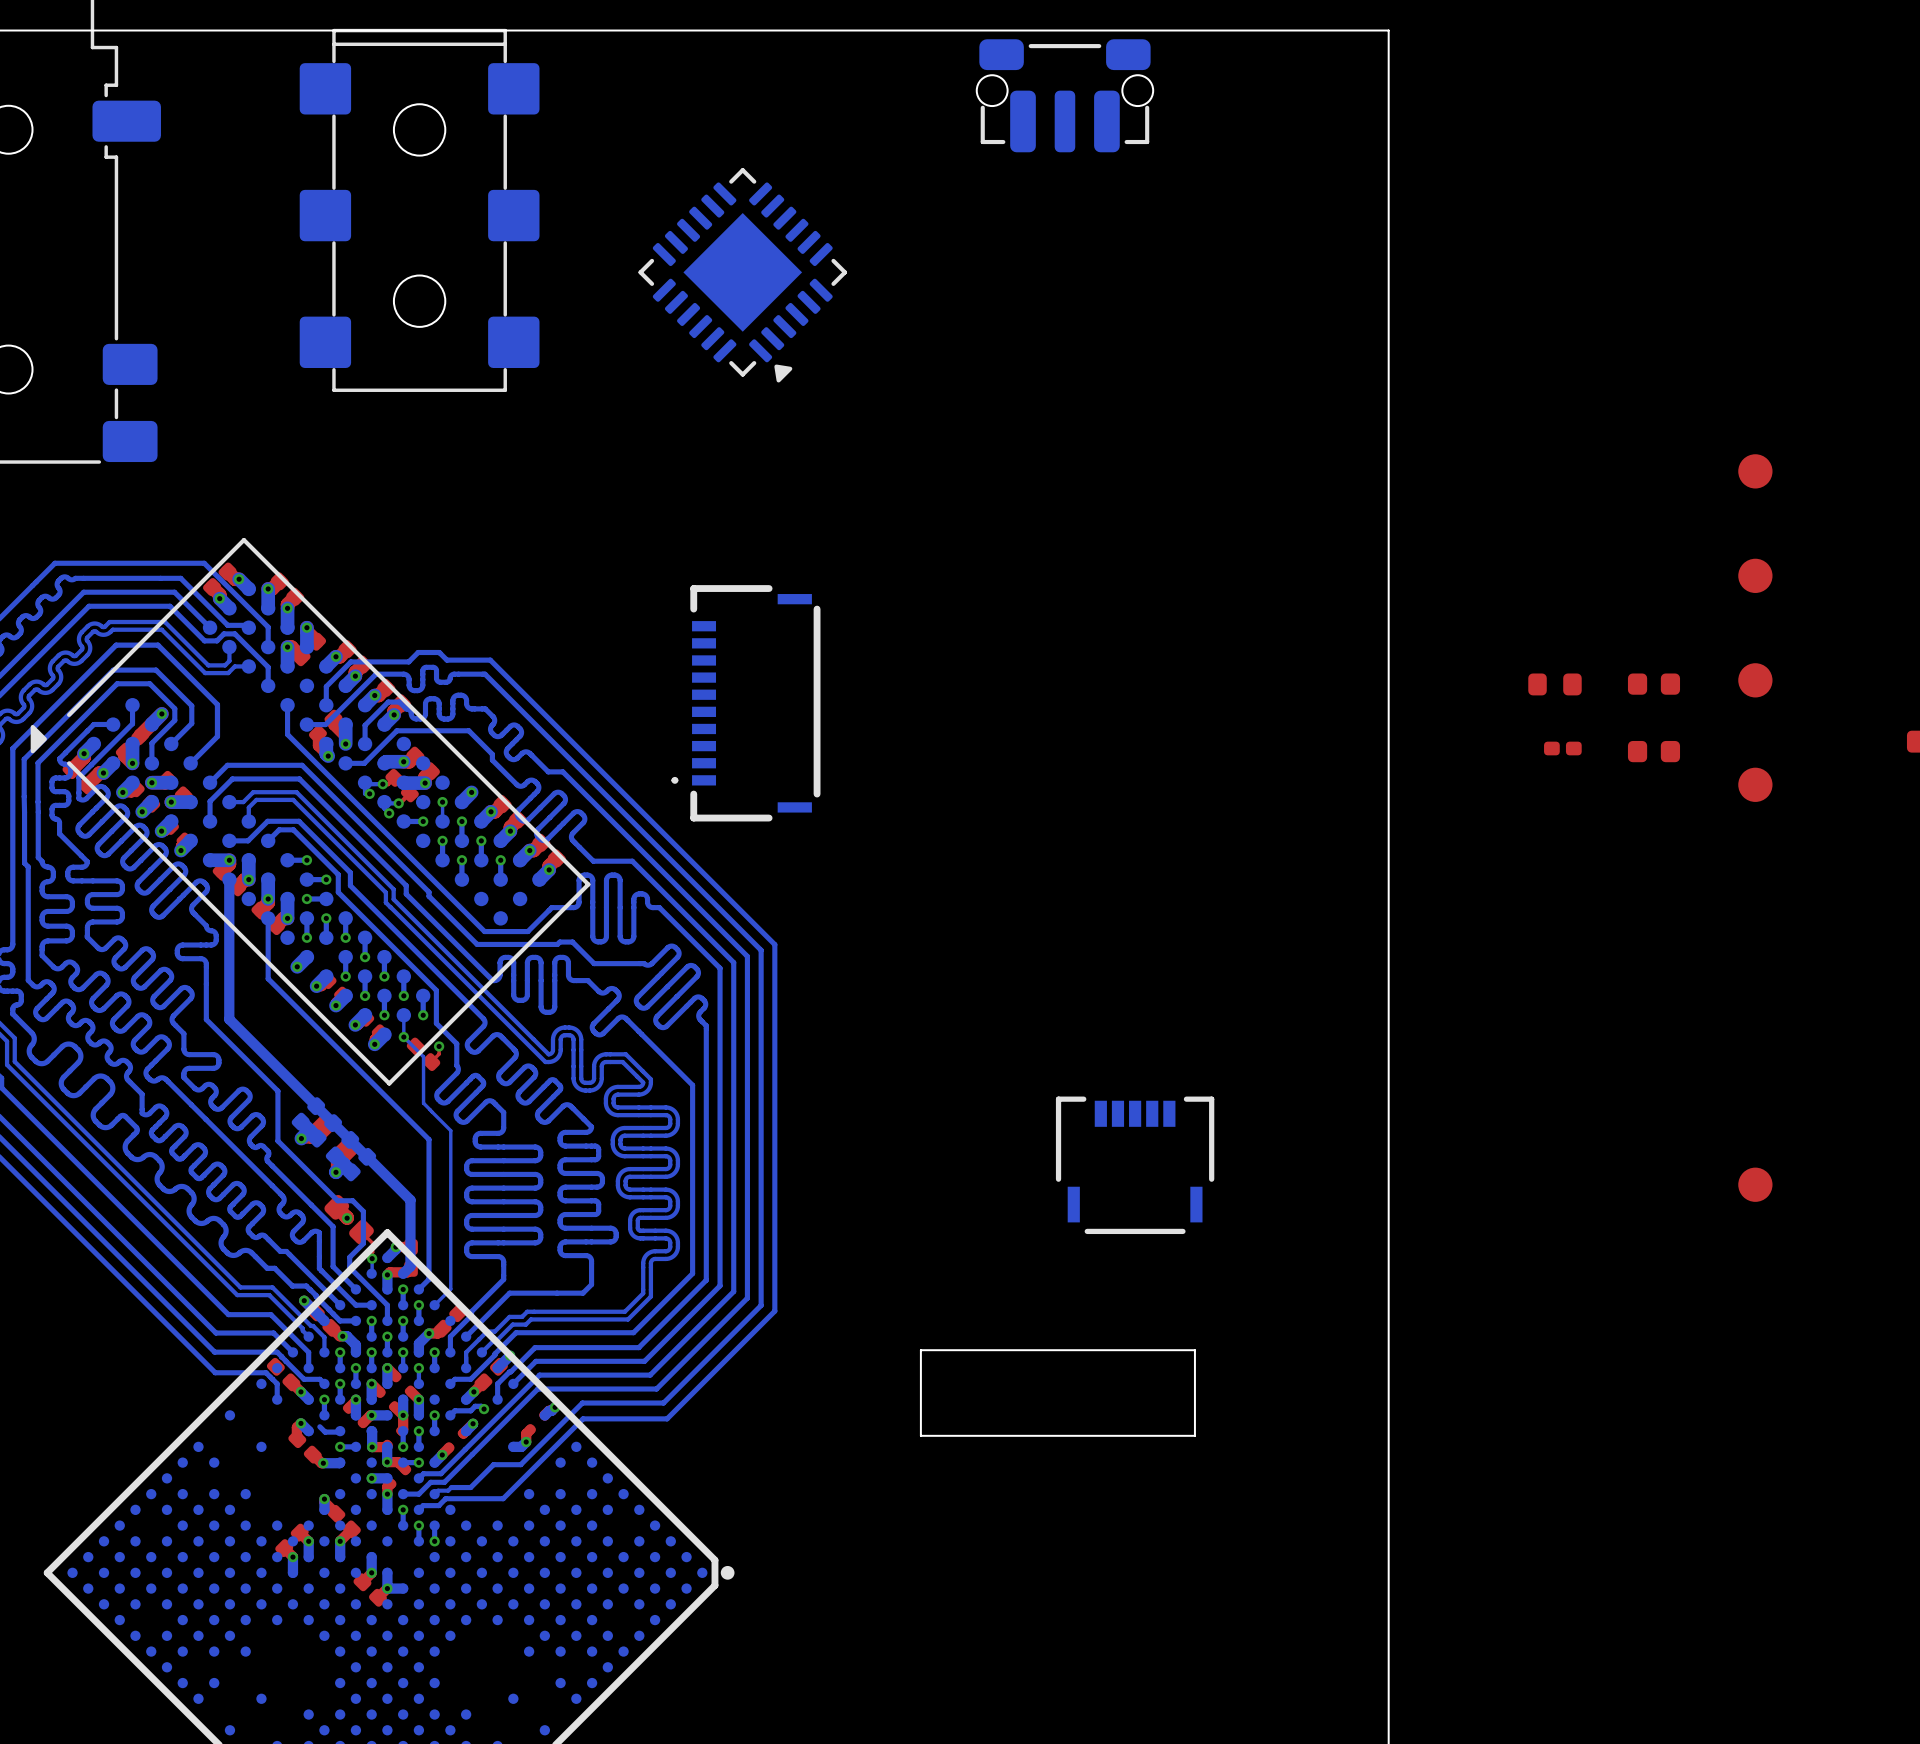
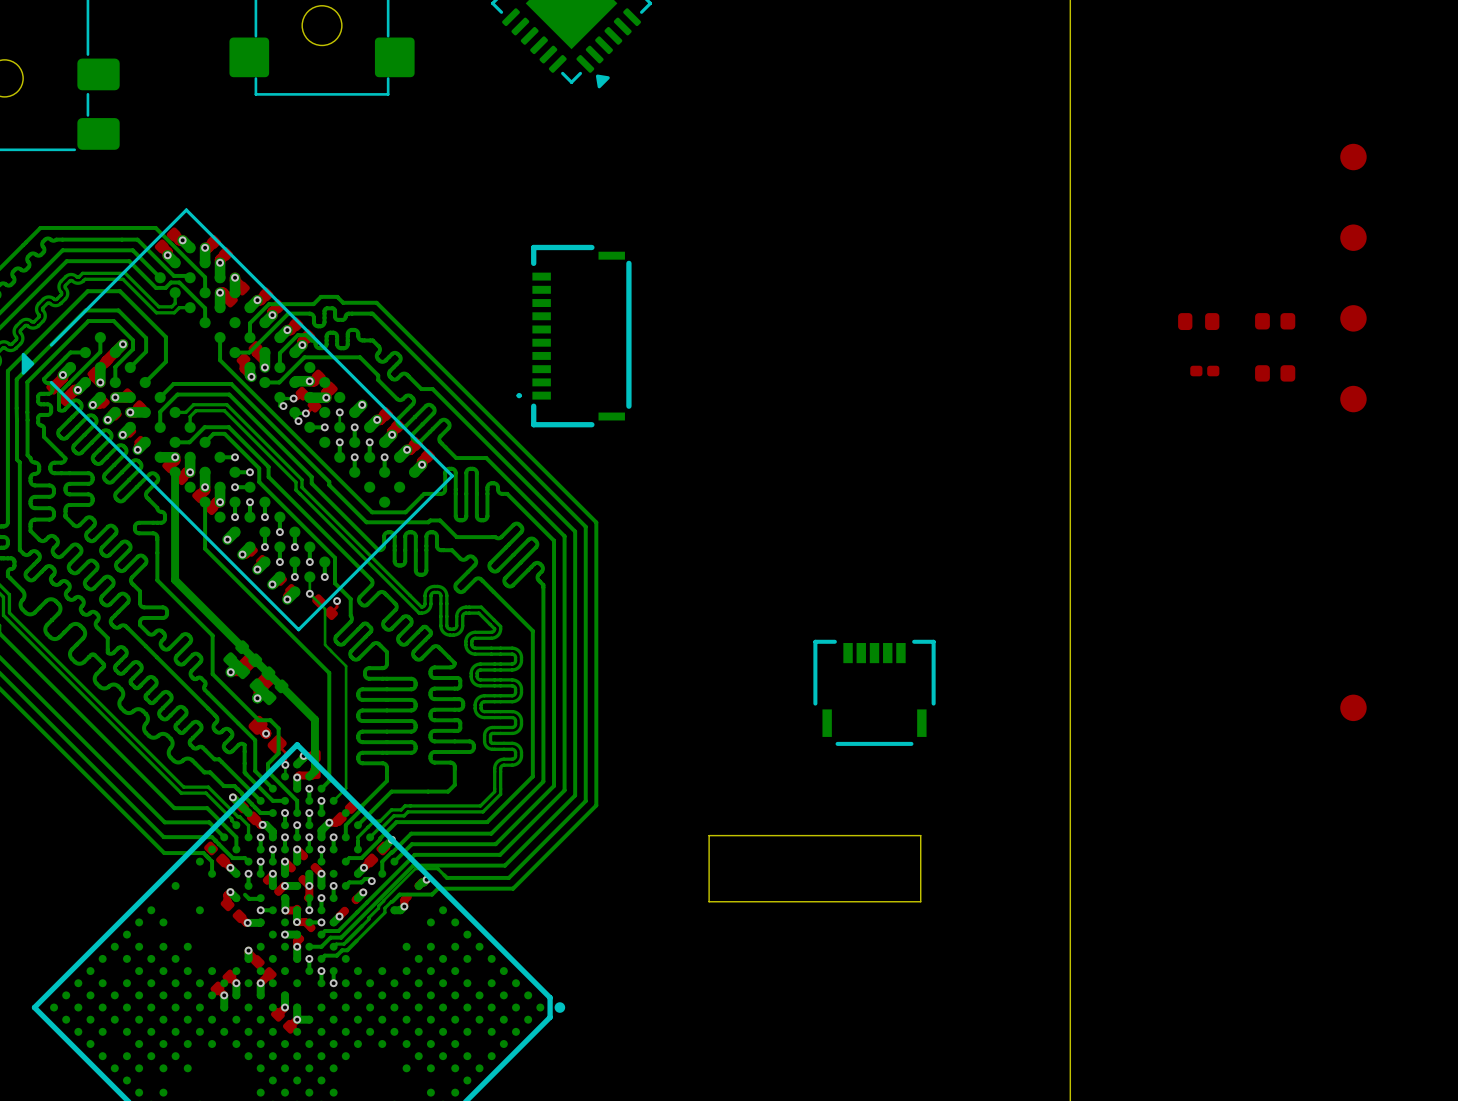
bottom track: (663, 1403) (582, 1403) (520, 1464) (493, 1464) (470, 1487) (451, 1487) -> (510, 876) (447, 877) (437, 868) (415, 868) (383, 900)
bottom track: (583, 1418) (503, 1498) (452, 1498) -> (448, 888) (438, 888) (432, 894) (399, 894) (384, 908) (384, 912) (347, 950)
bottom track: none -> (383, 900) (368, 919) (346, 941)

